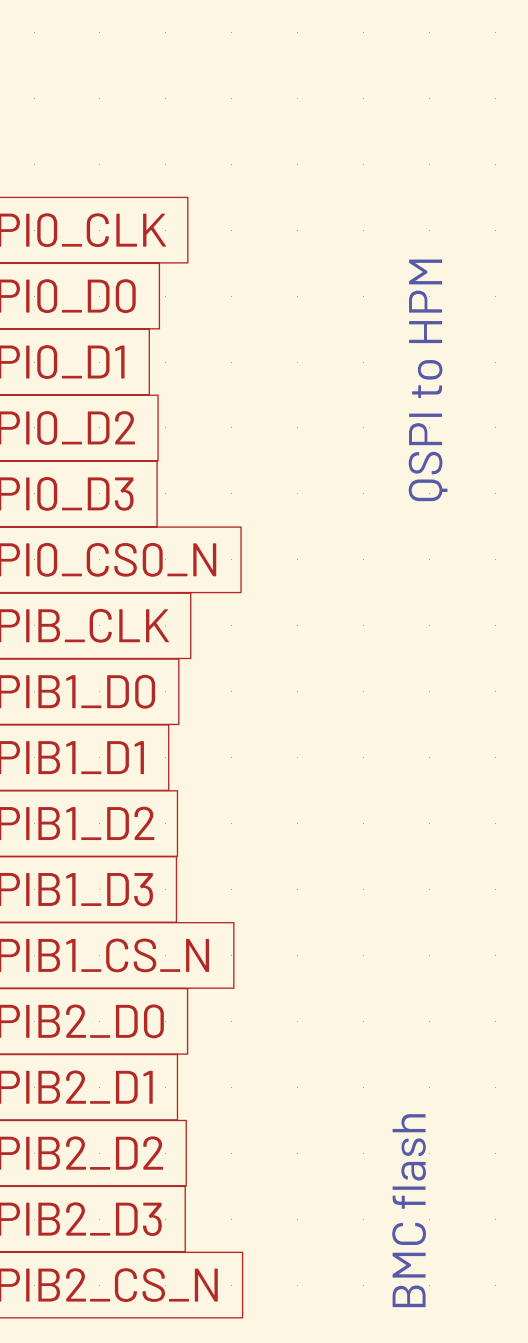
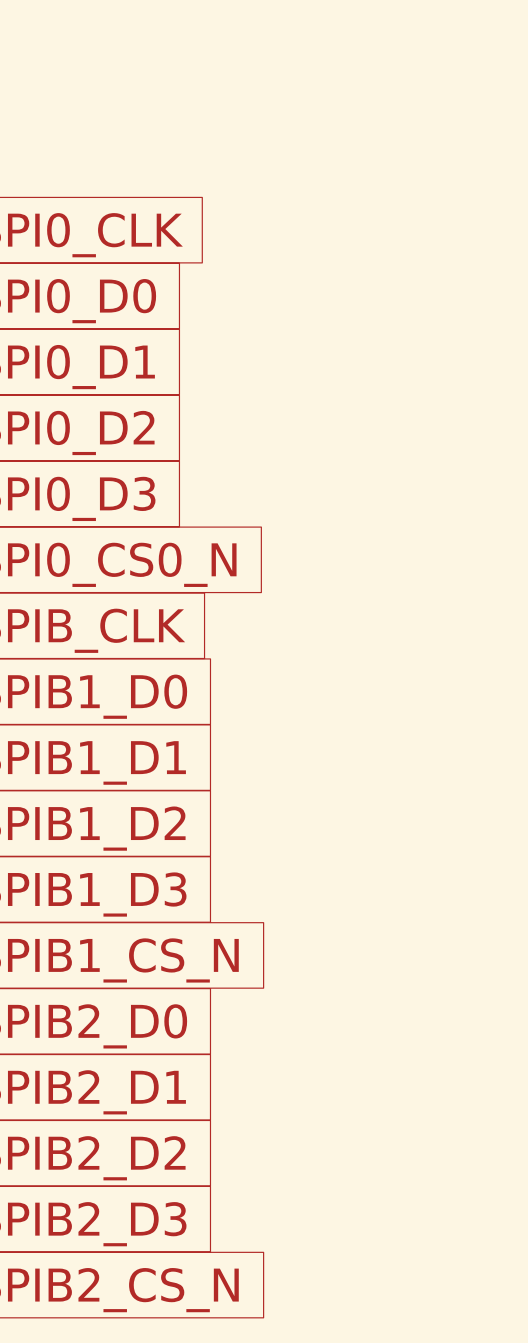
text: QSPI to HPM (428, 380) -> none
text: BMC flash (409, 1210) -> none

